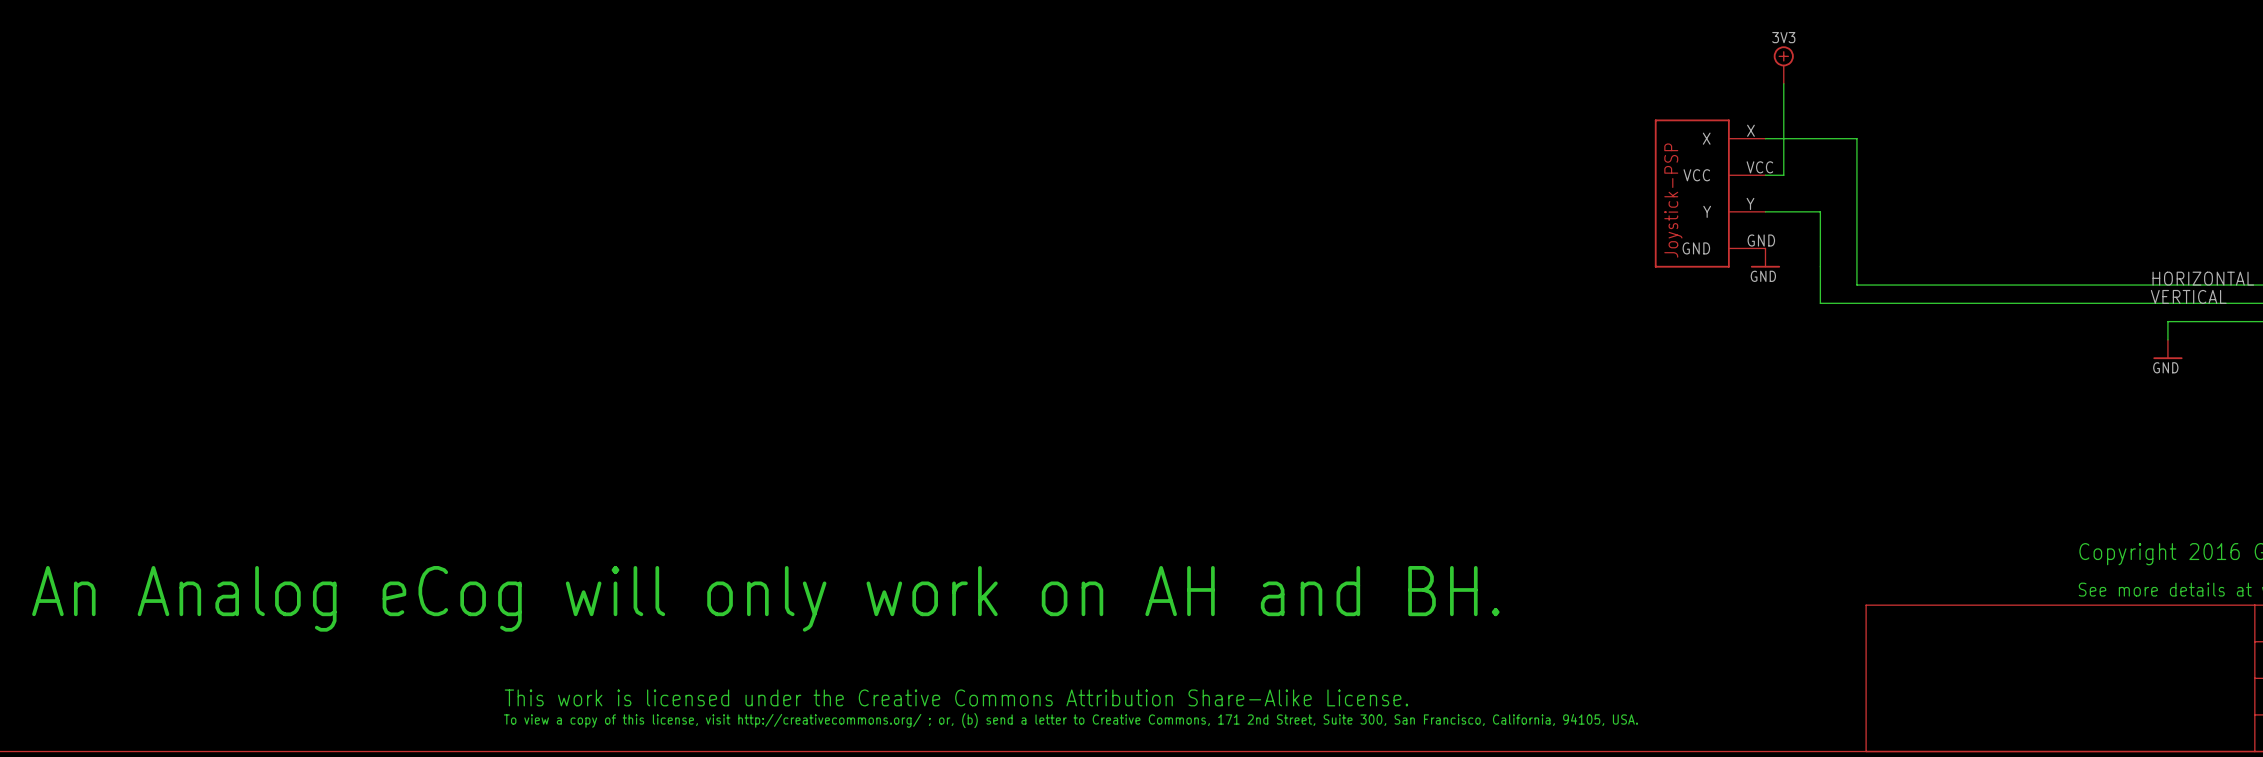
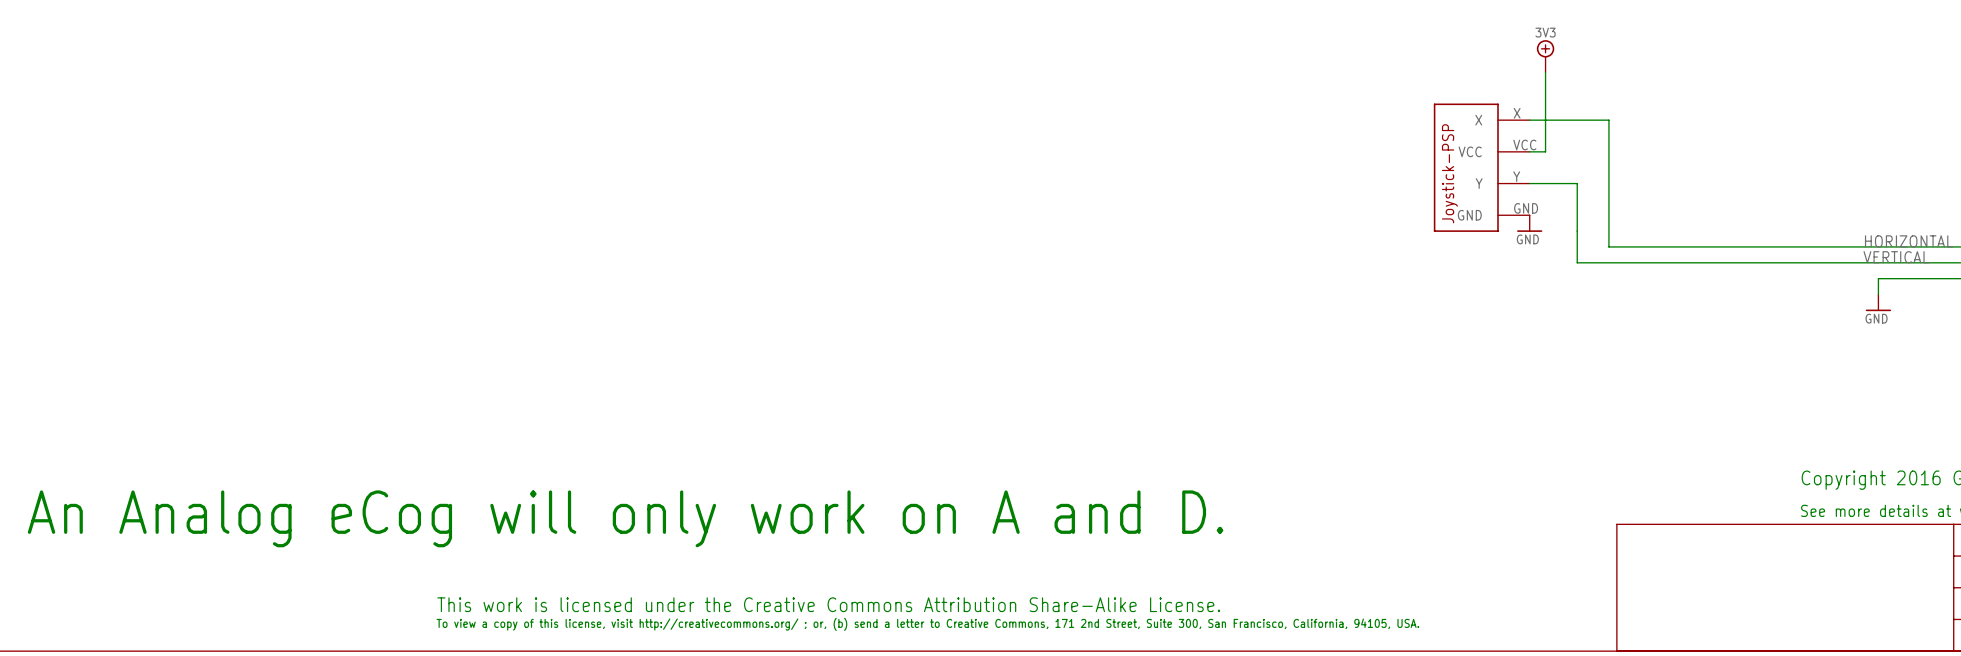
text: An Analog eCog will only work on AH and BH. (765, 598) -> An Analog eCog will only work on A and D. (625, 518)

